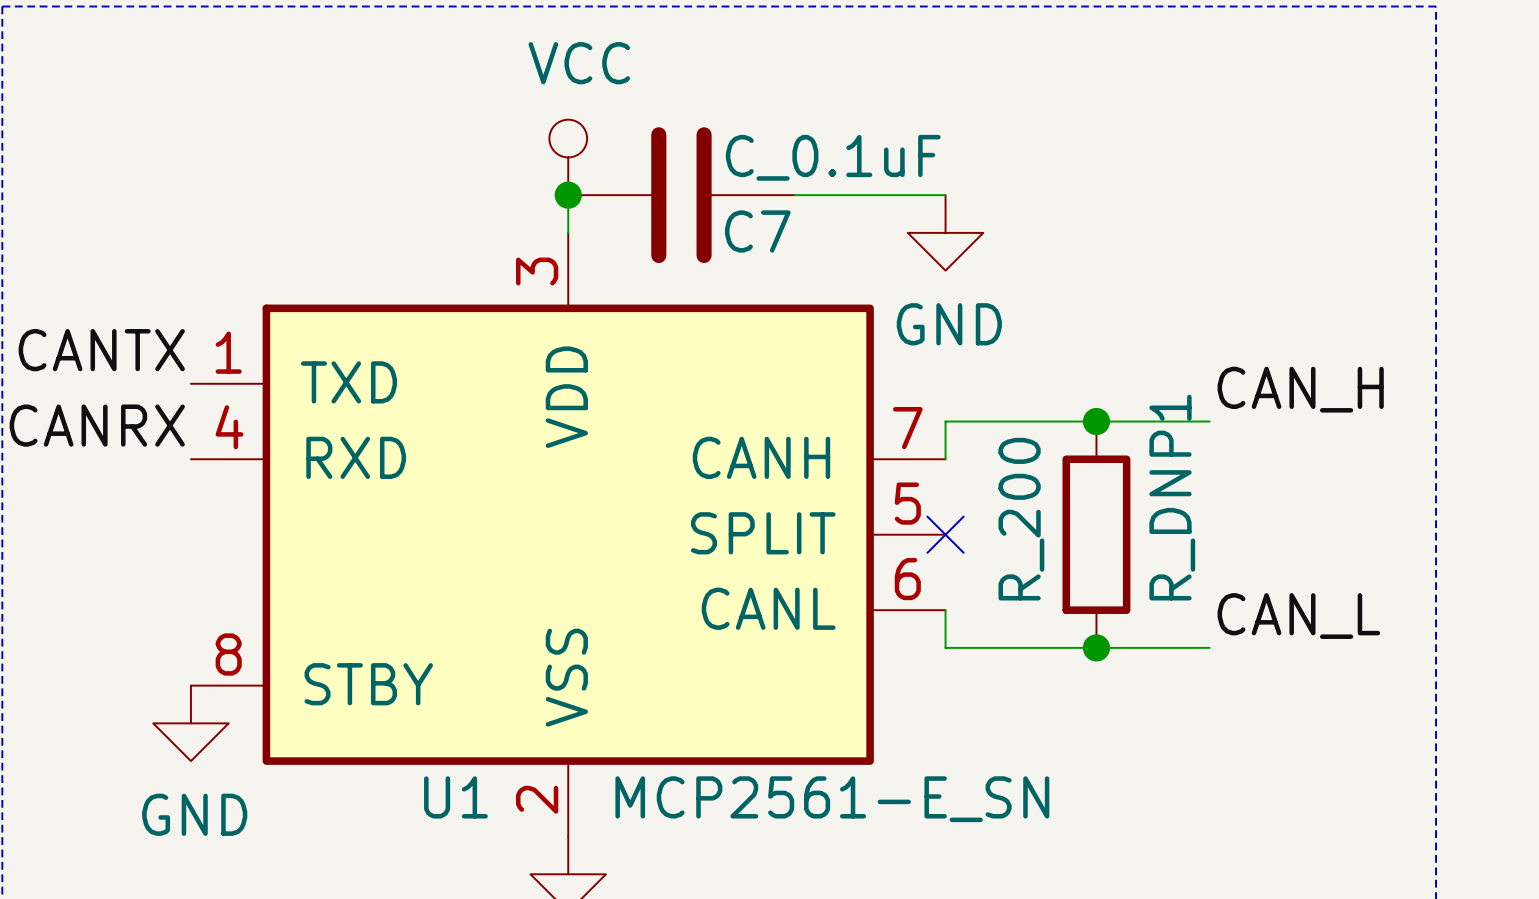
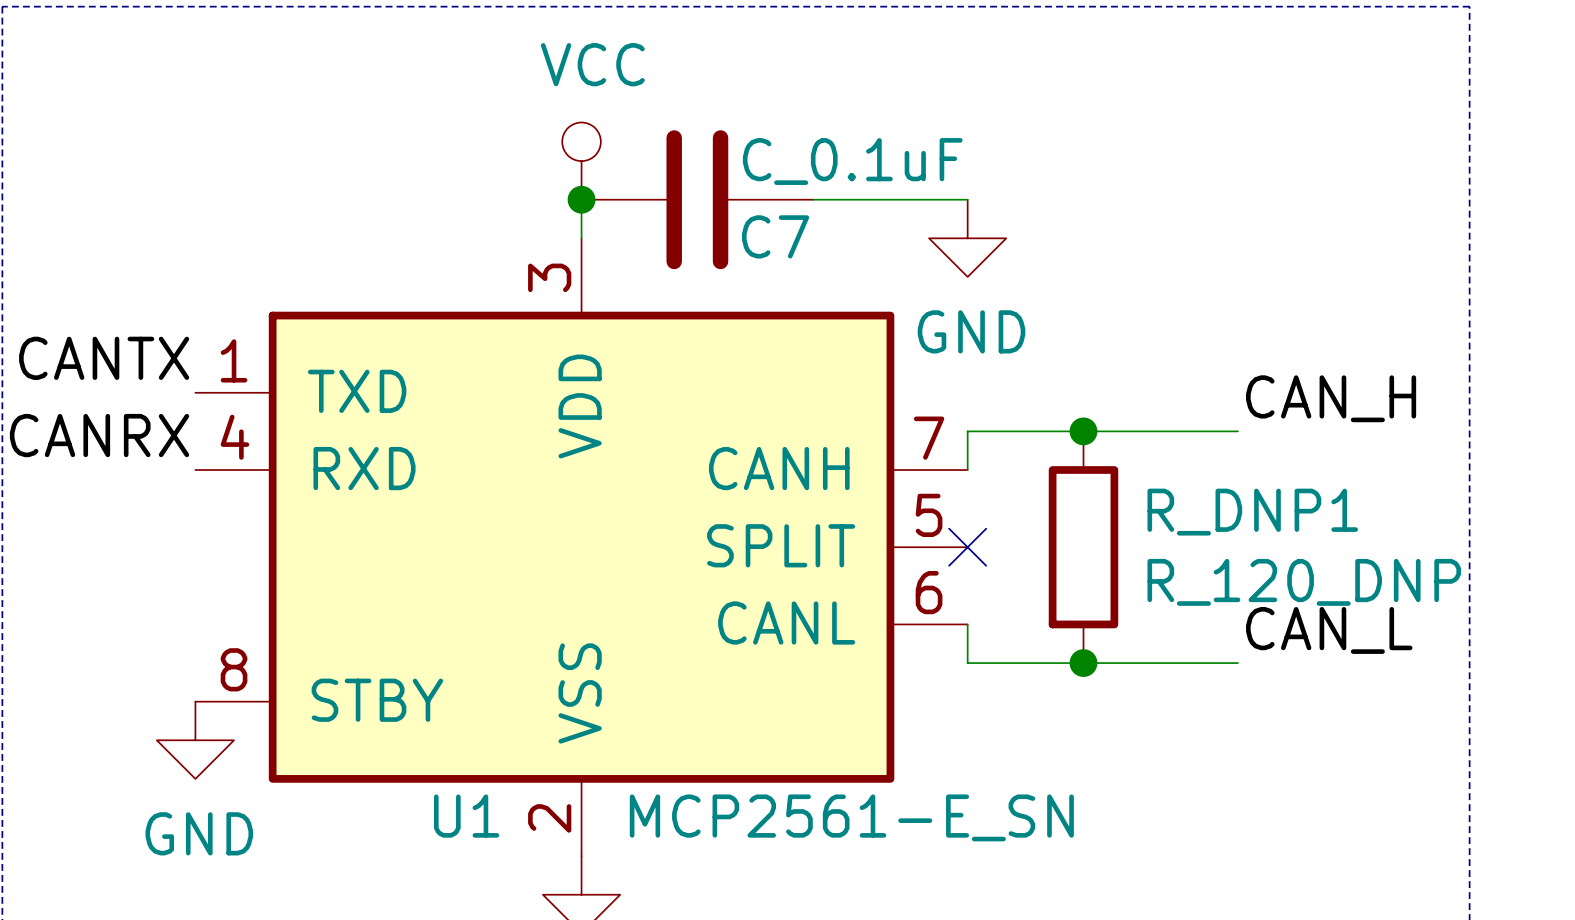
junction position: (1096, 421) -> (1083, 431)
R_DNP1 name rotation: 0° (1172, 497) -> 90° clockwise (1252, 512)
R_DNP1 value: R_200 (1021, 519) -> R_120_DNP (1304, 582)
R_DNP1 position: (1096, 534) -> (1083, 547)
junction position: (1096, 647) -> (1083, 663)

